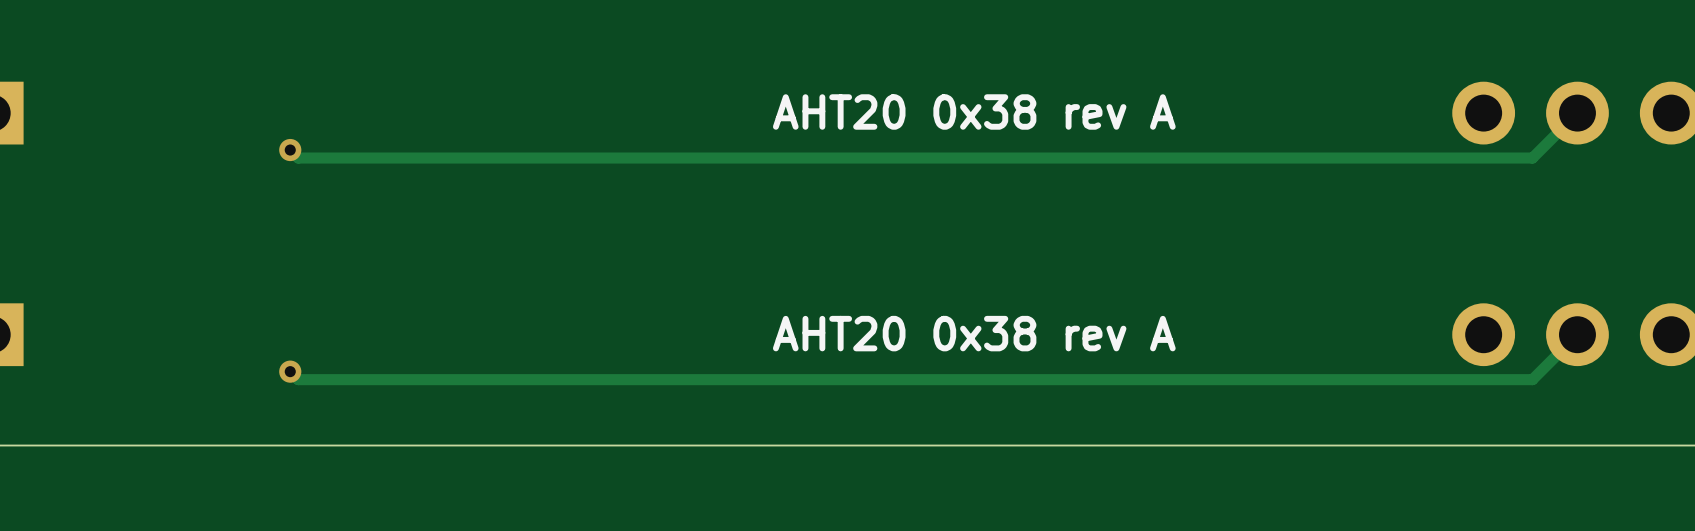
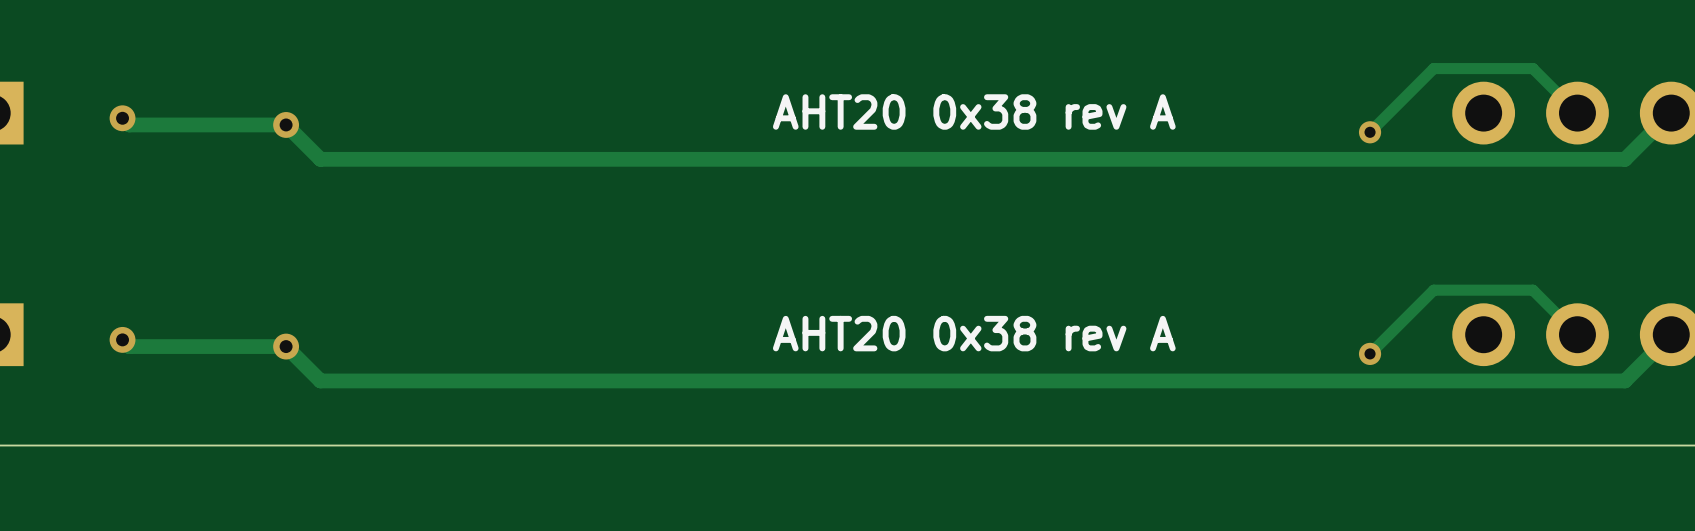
track: (1577, 113) (1532, 158) (298, 158) (290, 150) -> (1577, 113) (1532, 68) (1433, 68) (1370, 132)
track: none -> (1671, 113) (1625, 159) (320, 159) (286, 124) (129, 124) (122, 118)
via: none -> (122, 118)
via: none -> (286, 124)
via: none -> (1370, 132)
via: (290, 150) -> none
track: (1577, 334) (1532, 379) (298, 379) (290, 371) -> (1577, 334) (1532, 290) (1433, 290) (1370, 353)
track: none -> (1671, 334) (1625, 380) (320, 380) (286, 346) (129, 346) (122, 339)
via: none -> (122, 339)
via: none -> (286, 346)
via: none -> (1370, 353)
via: (290, 371) -> none

